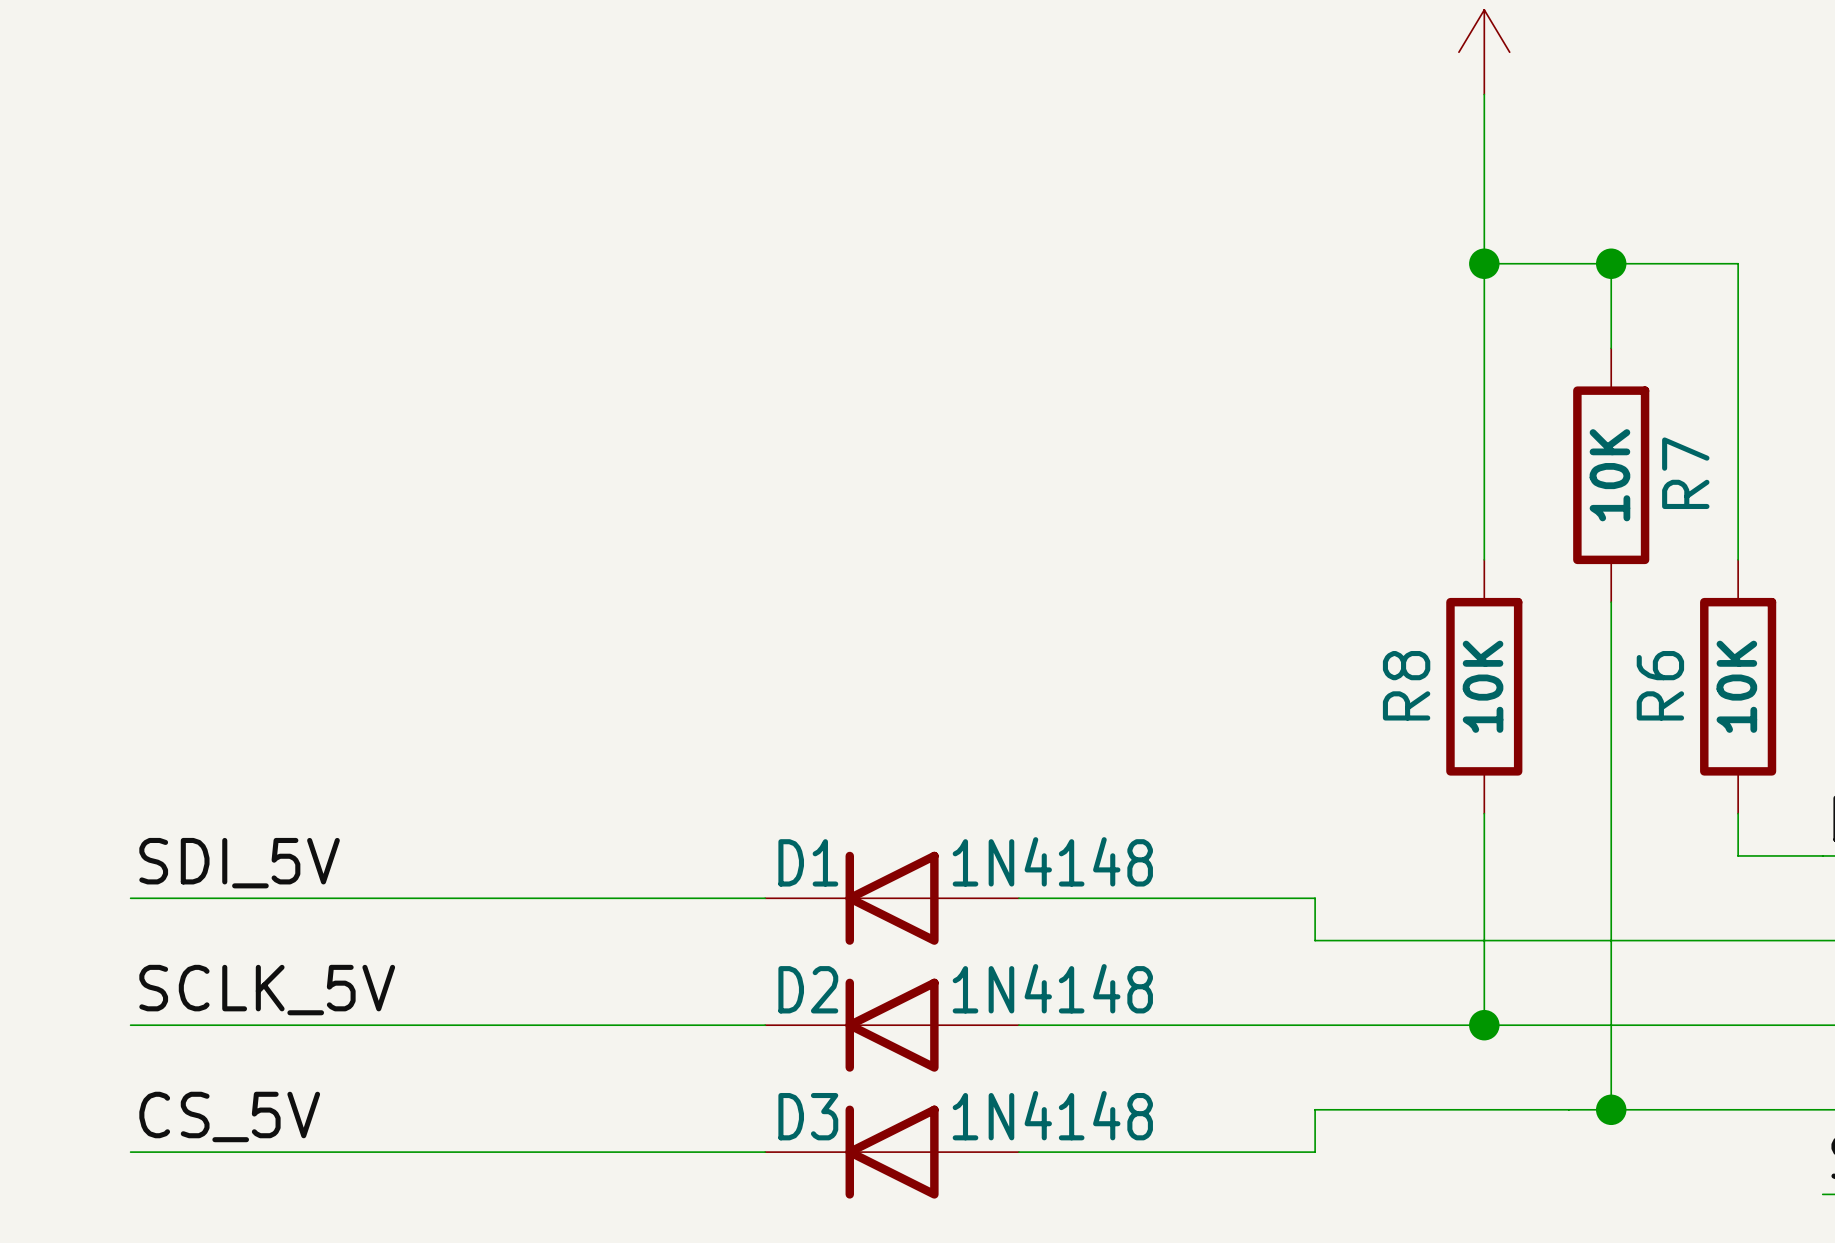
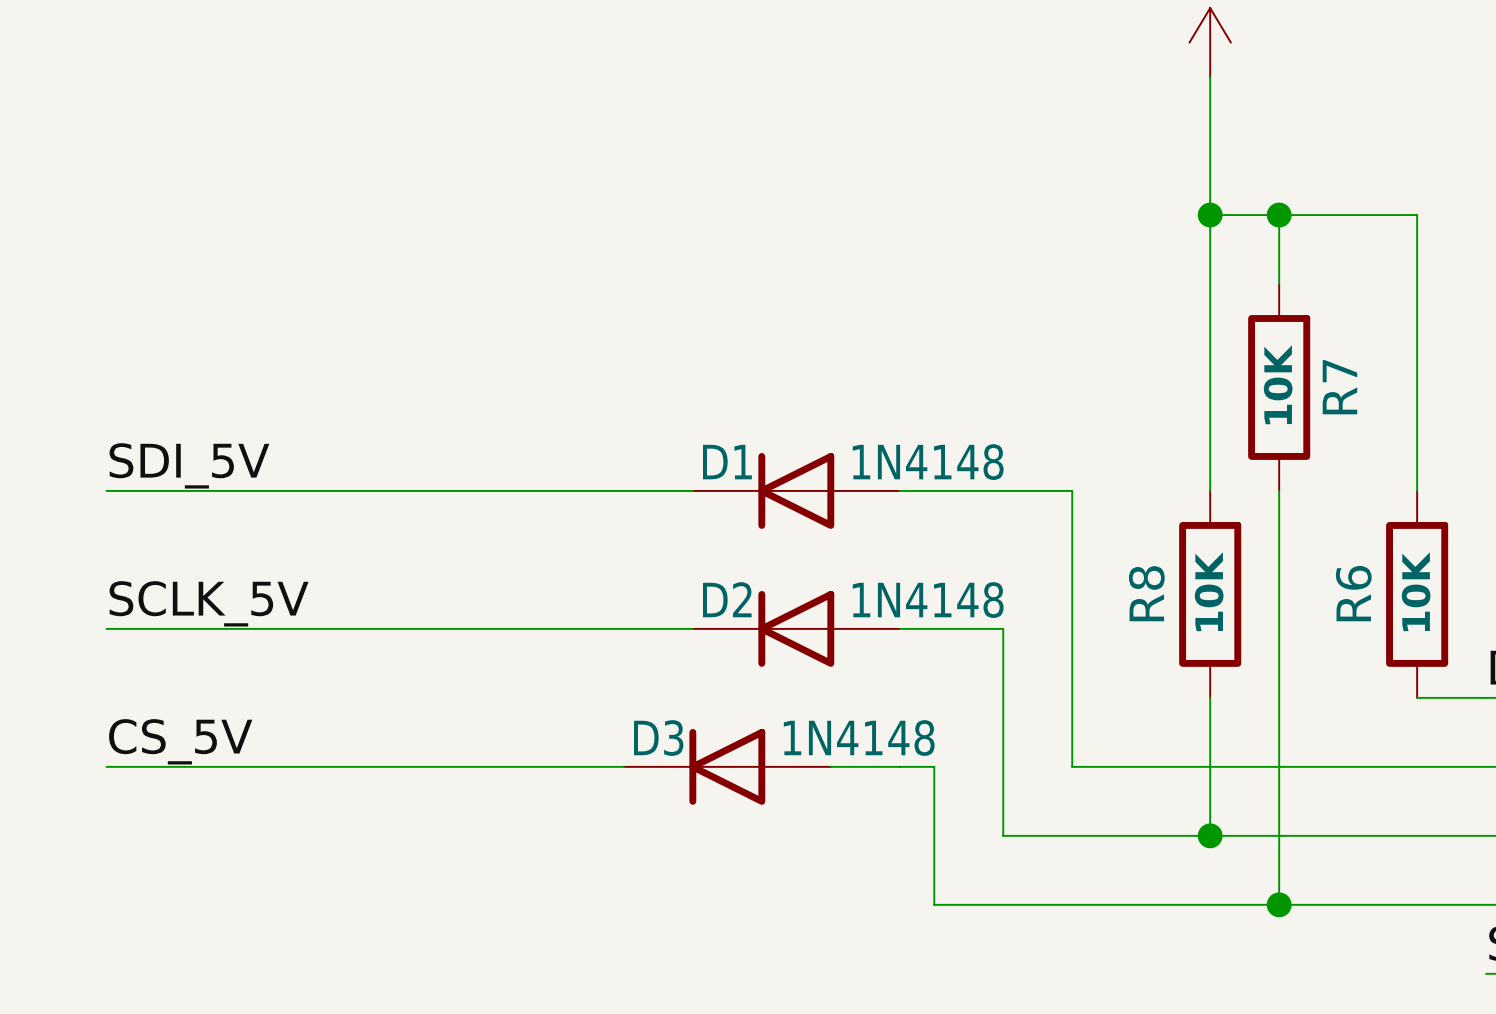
wire: (1611, 263) (1611, 348) -> (1279, 215) (1279, 284)
junction position: (1611, 263) -> (1279, 215)
R7 position: (1611, 475) -> (1279, 387)
wire: none -> (106, 490) (692, 490)
wire: (1611, 602) (1611, 1109) -> (1279, 490) (1279, 904)
R8 position: (1484, 686) -> (1210, 594)
R6 position: (1738, 686) -> (1417, 594)
wire: none -> (106, 628) (692, 628)
label position: SDI_5V (239, 863) -> SDI_5V (189, 465)
wire: (130, 898) (765, 898) -> (106, 766) (623, 766)
D1 position: (892, 898) -> (796, 490)
wire: (1018, 898) (1315, 898) -> (899, 490) (1072, 490) (1072, 732)
label position: SCLK_5V (267, 990) -> SCLK_5V (209, 603)
wire: (130, 1025) (765, 1025) -> none
D2 position: (892, 1025) -> (796, 628)
wire: (1018, 1025) (1230, 1025) -> (899, 628) (1003, 628) (1003, 835)
wire: (1315, 1109) (1315, 1152) (1018, 1152) -> (1072, 904) (934, 904) (934, 766) (830, 766)
junction position: (1611, 1109) -> (1279, 904)
label position: CS_5V (229, 1116) -> CS_5V (180, 741)
wire: (130, 1152) (765, 1152) -> none
D3 position: (892, 1152) -> (727, 766)

